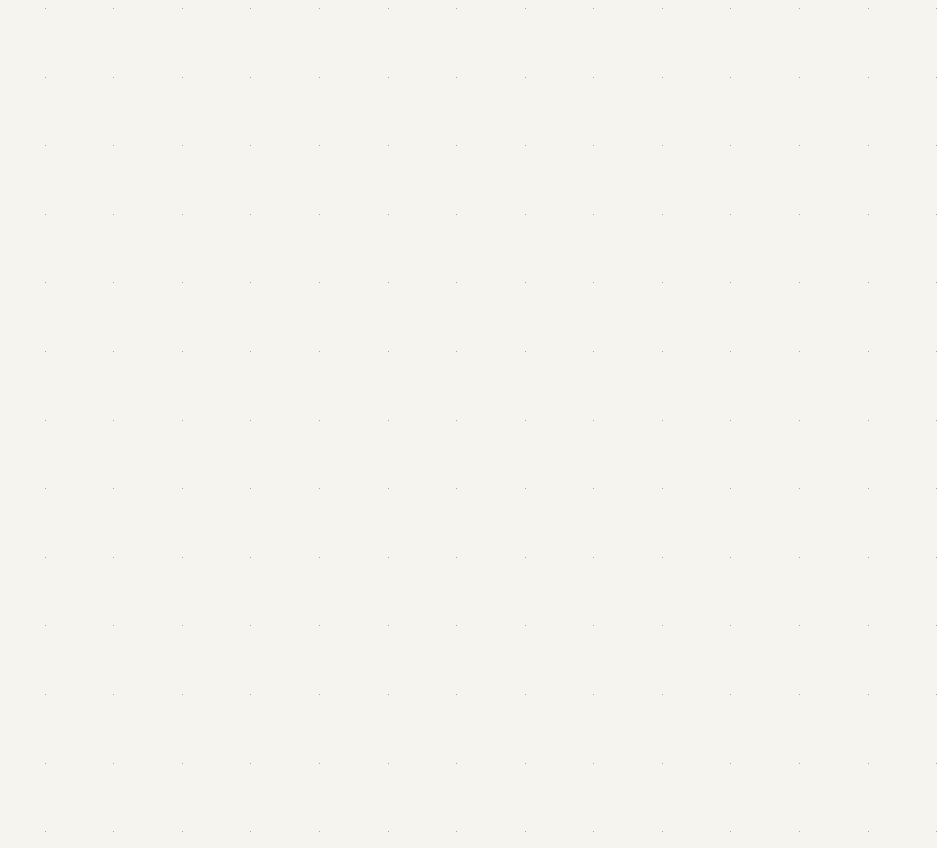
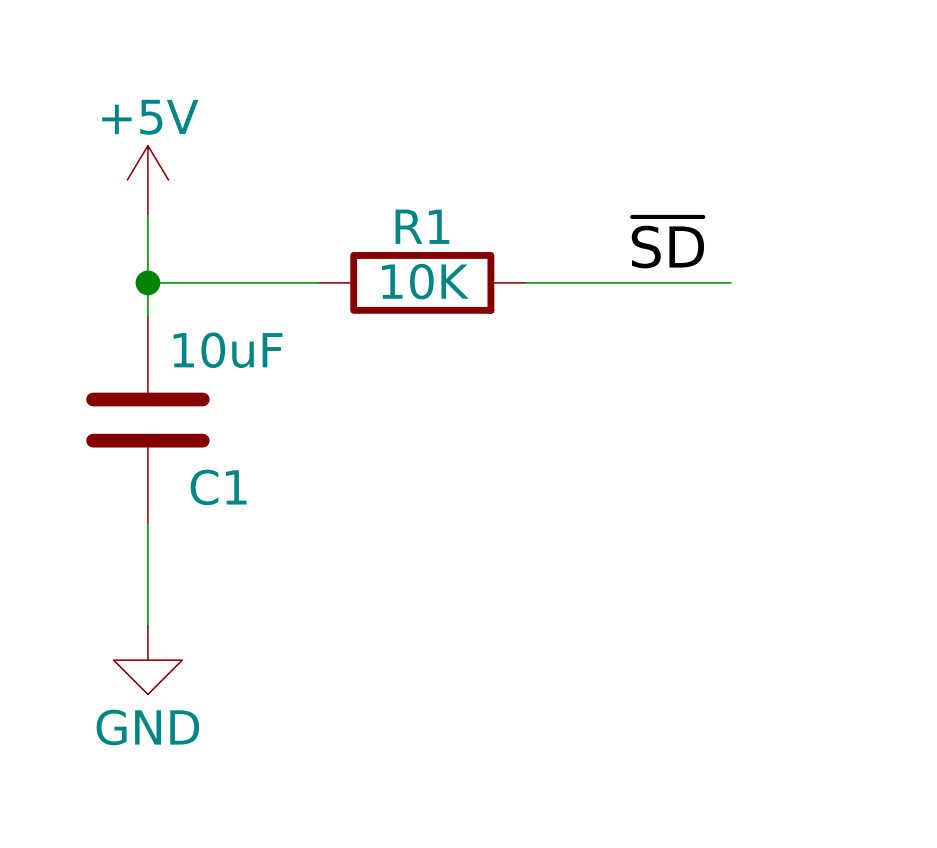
power symbol: none -> +5V (147, 180)
wire: none -> (147, 214) (147, 317)
label: none -> ~{SD} (667, 242)
wire: none -> (147, 282) (319, 282)
junction: none -> (147, 282)
R1: none -> 10K (422, 282)
wire: none -> (525, 282) (730, 282)
C1: none -> 10uF (147, 420)
wire: none -> (147, 522) (147, 625)
power symbol: none -> GND (147, 660)

